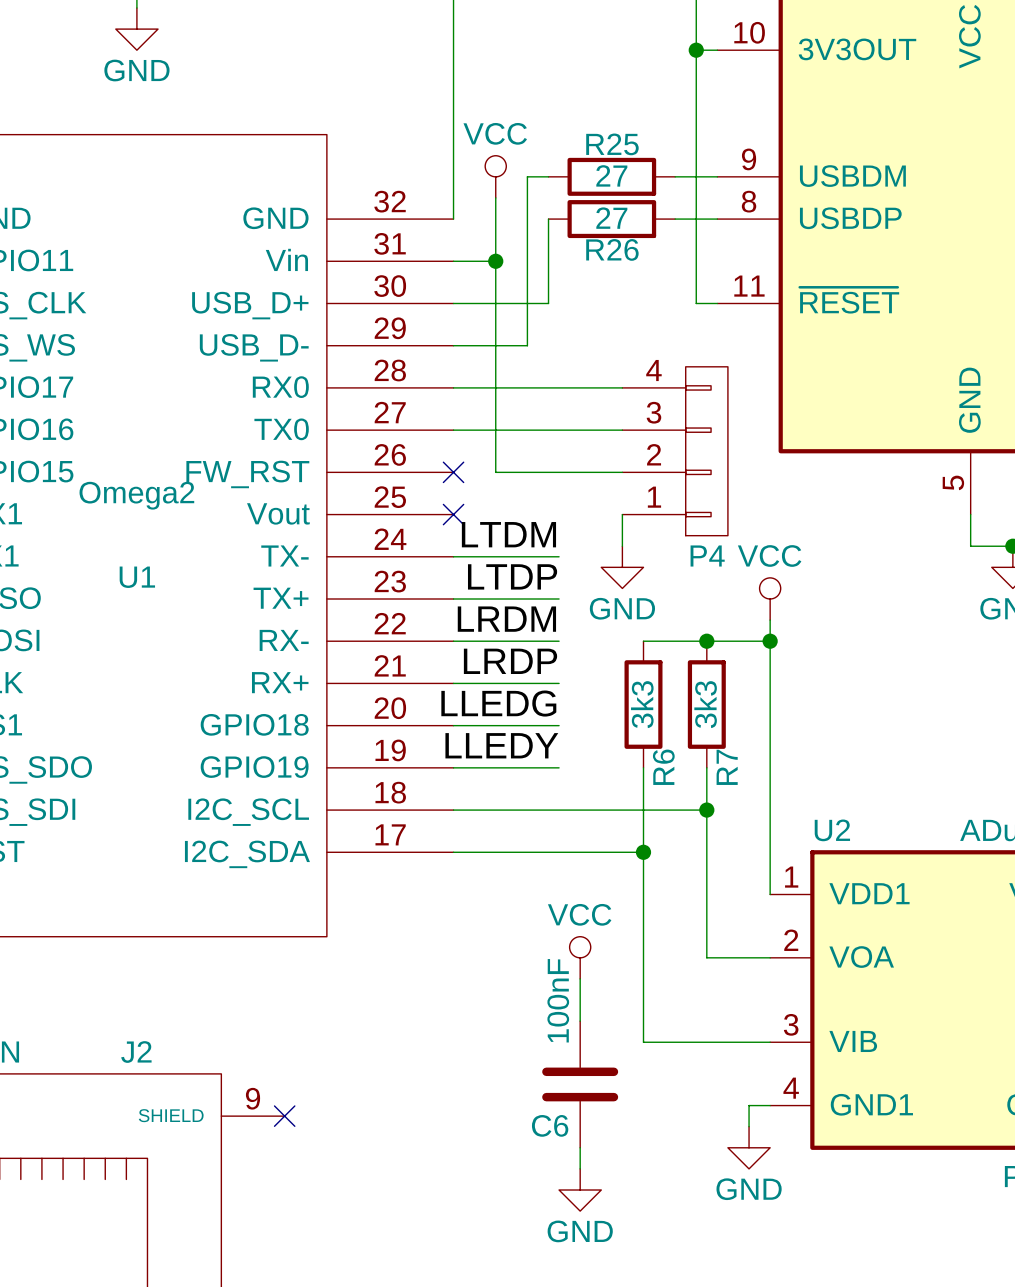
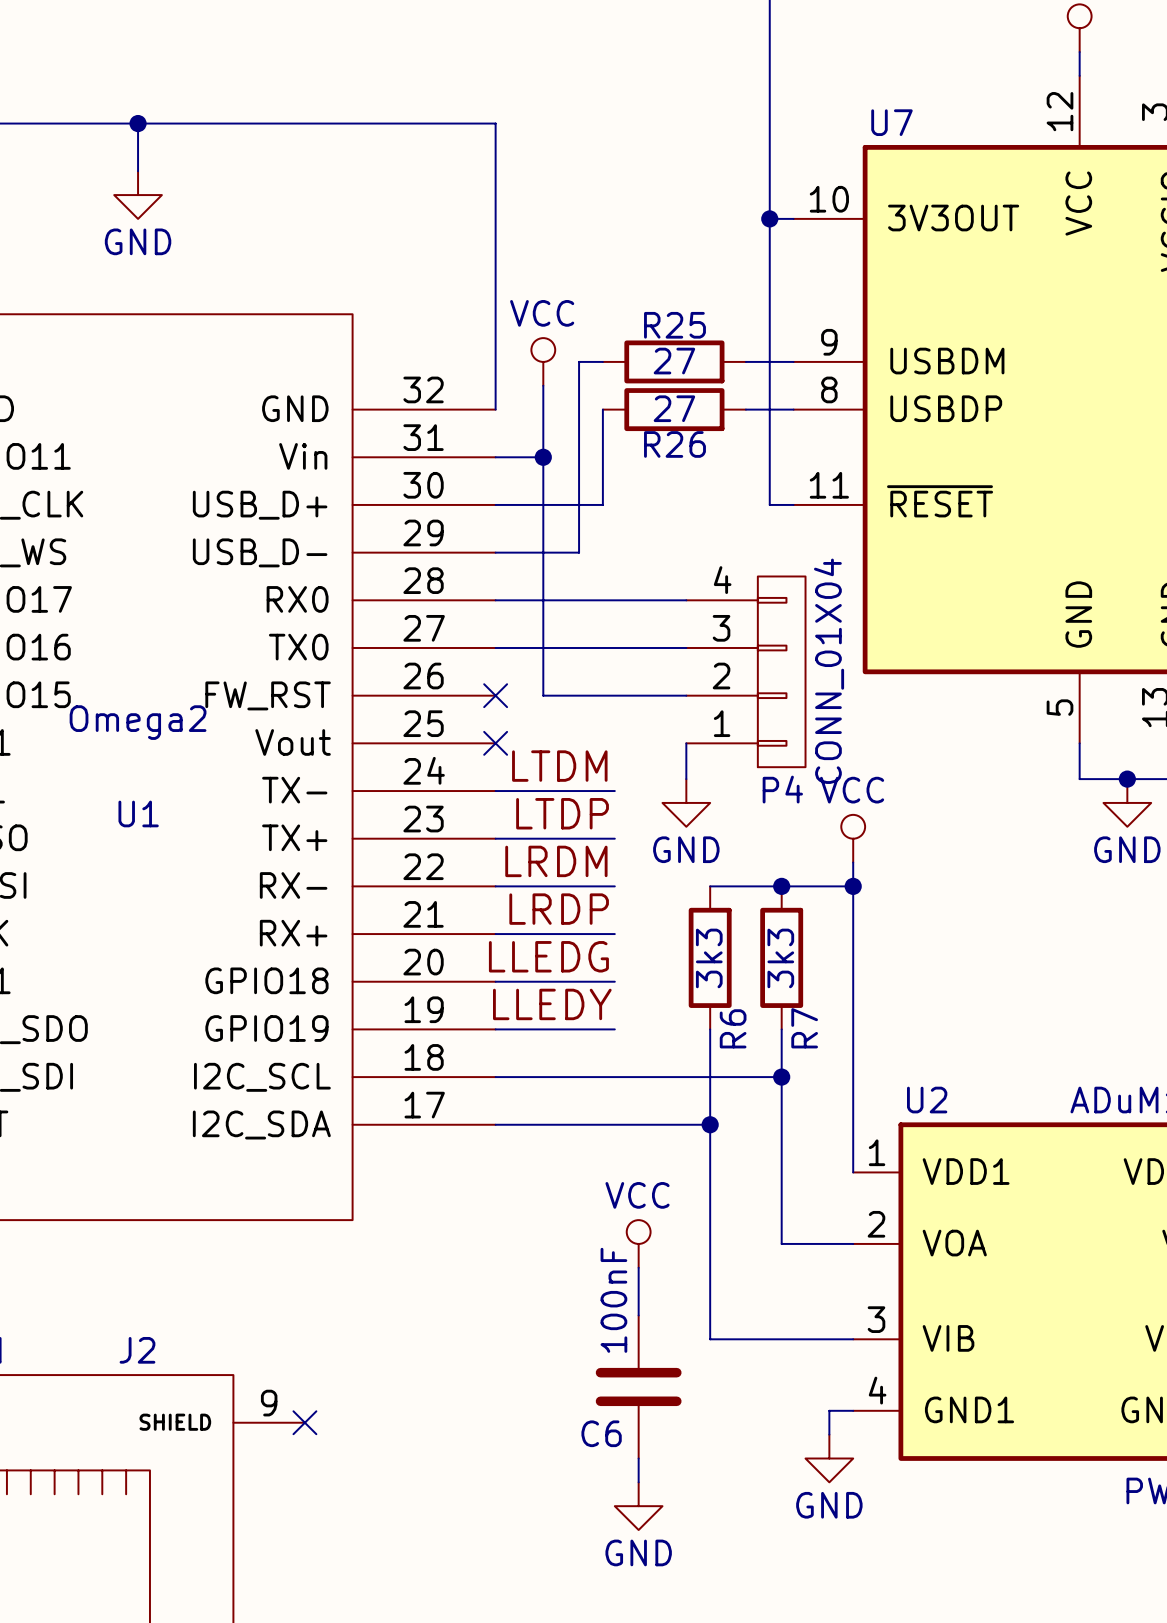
P4 value: none -> CONN_01X04 (829, 671)

